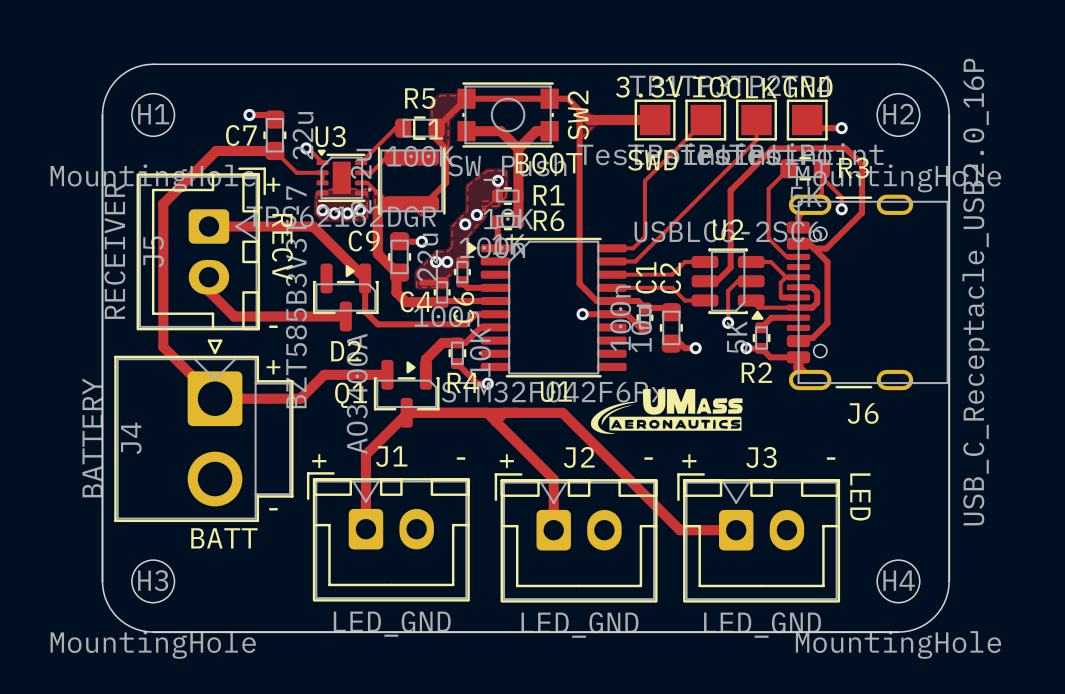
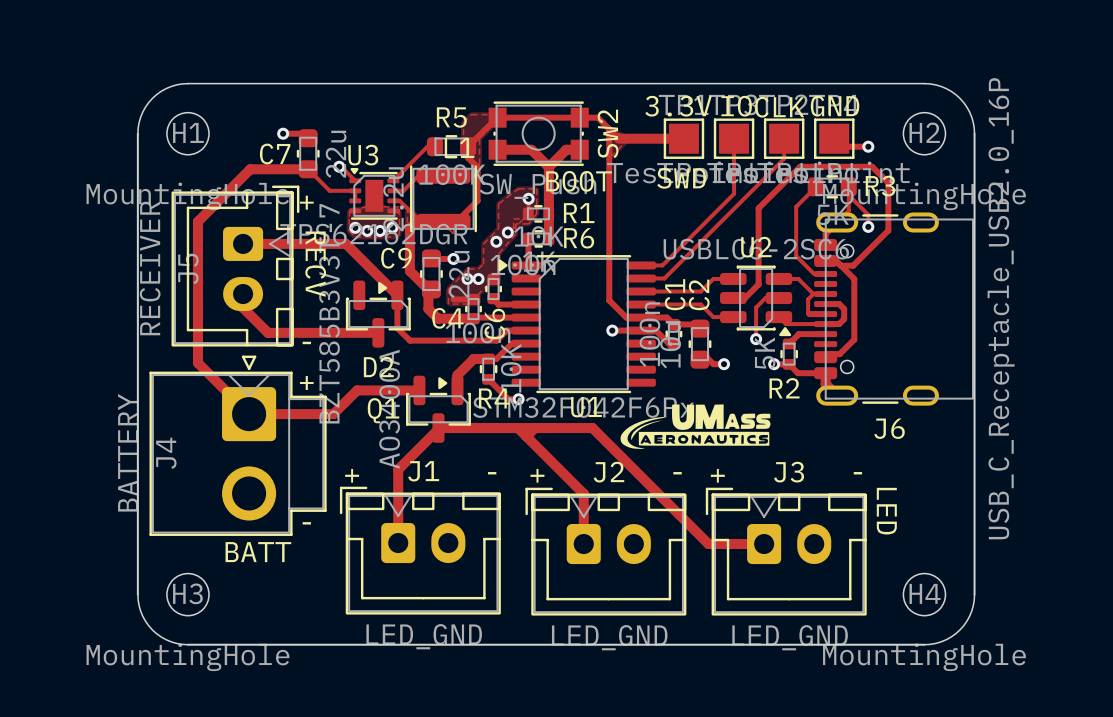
track: (705, 120) (644, 180) (644, 236) -> (734, 138) (734, 193) (673, 253)

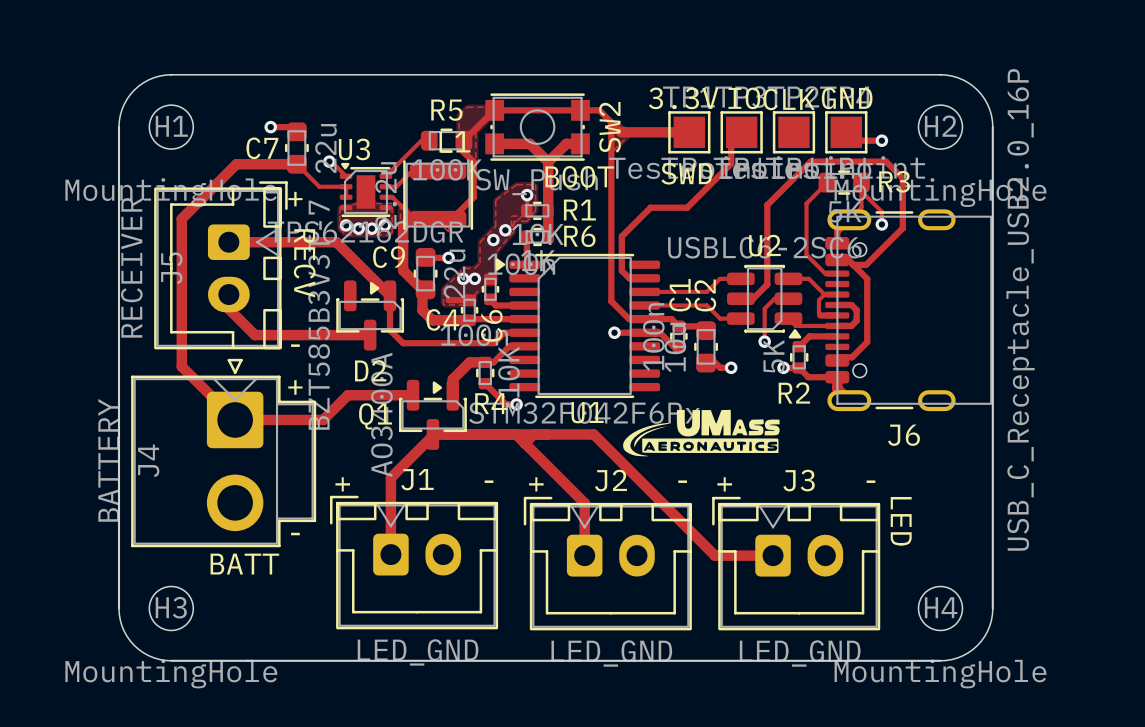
track: (734, 138) (734, 193) (662, 265) (641, 265) -> (741, 132) (731, 142) (731, 163) (687, 207) (650, 207) (621, 236) (621, 270) (629, 278) (644, 278)
track: (784, 138) (784, 158) (664, 278) (641, 278) -> none

